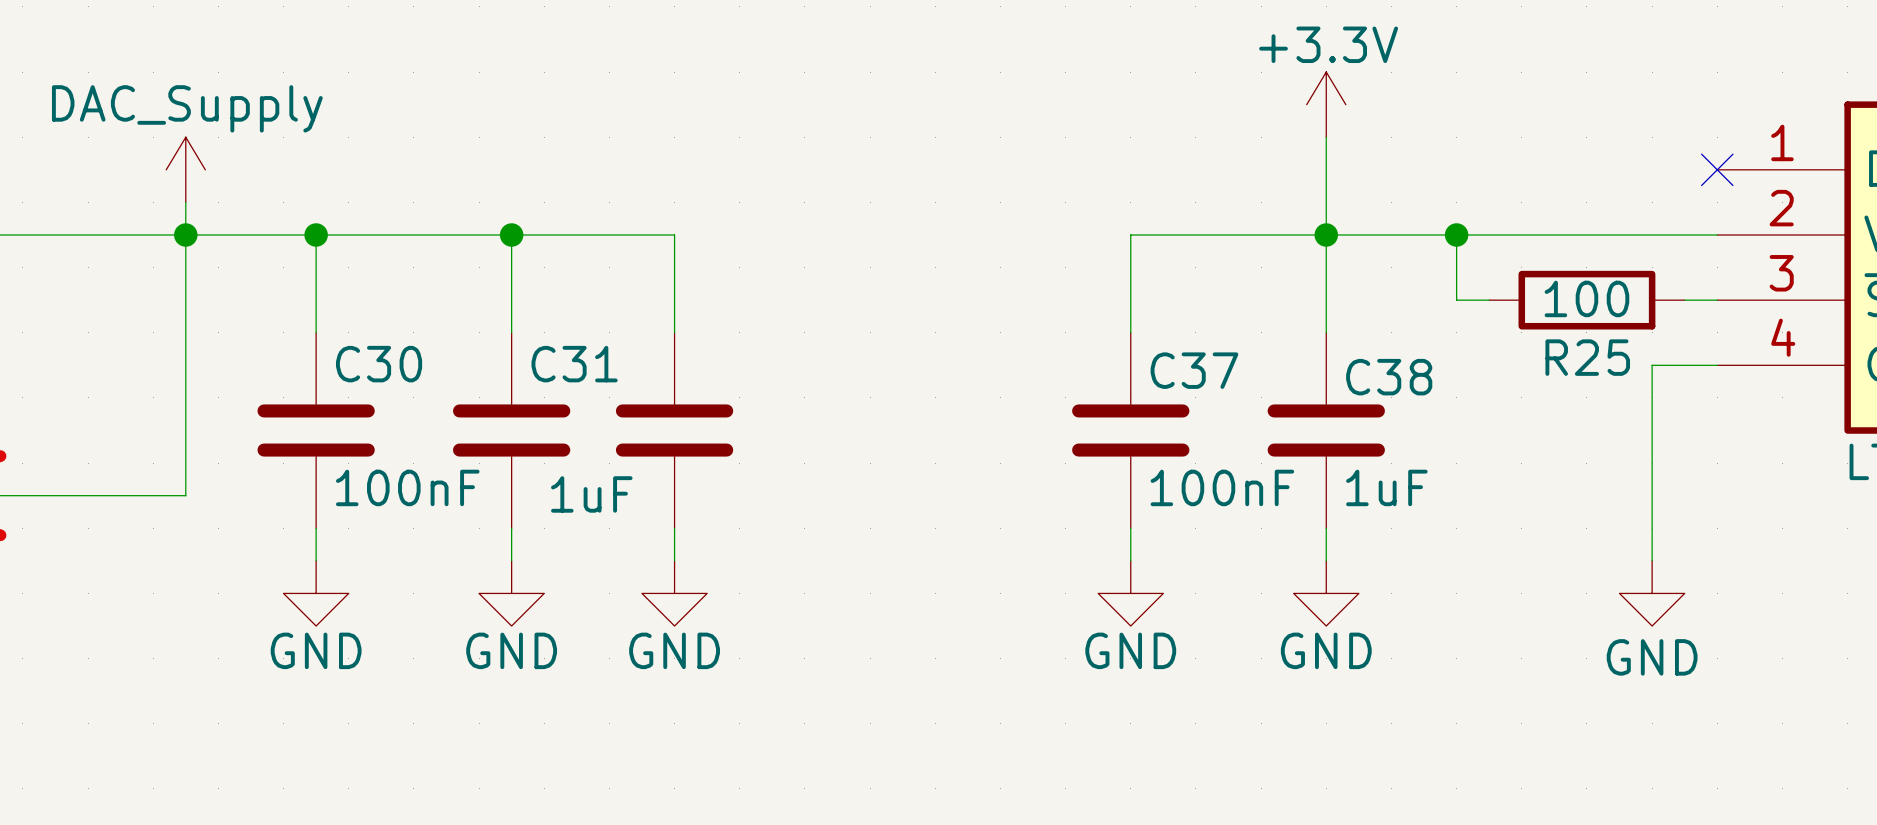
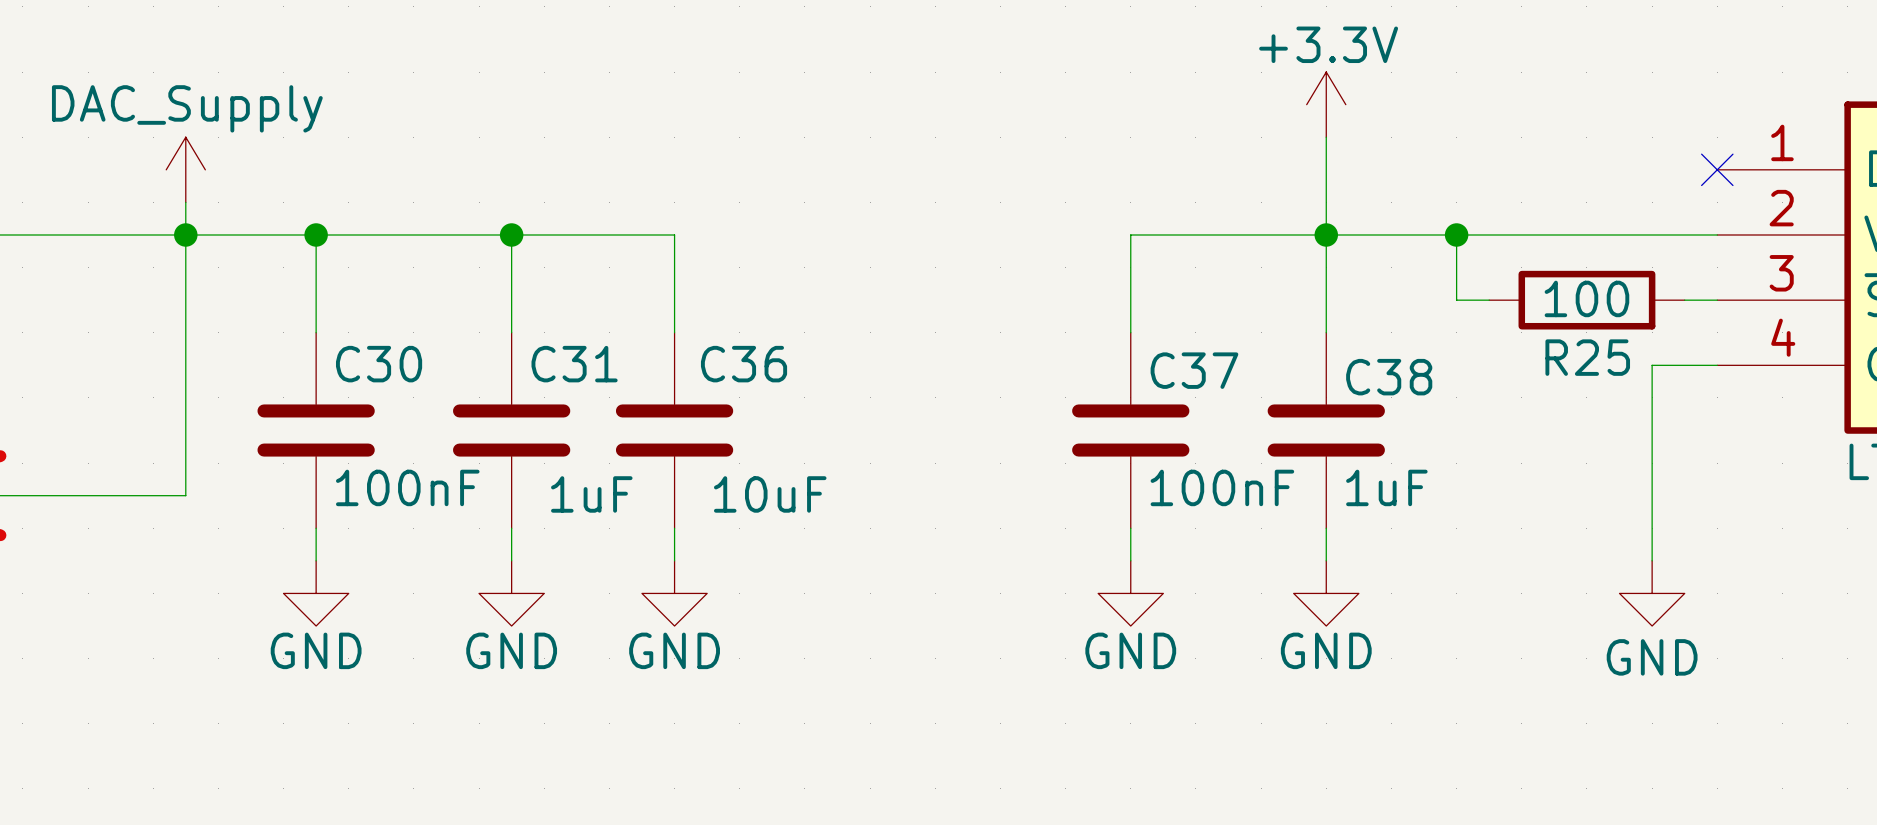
C36 name: none -> C36 (744, 364)
C36 value: none -> 10uF (770, 494)

